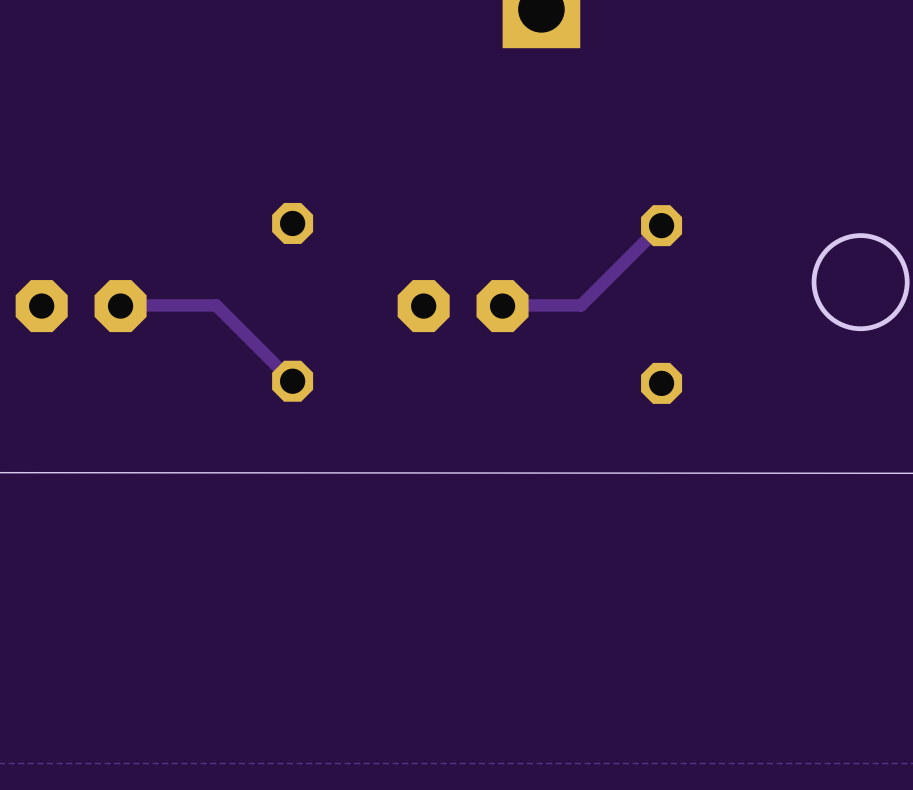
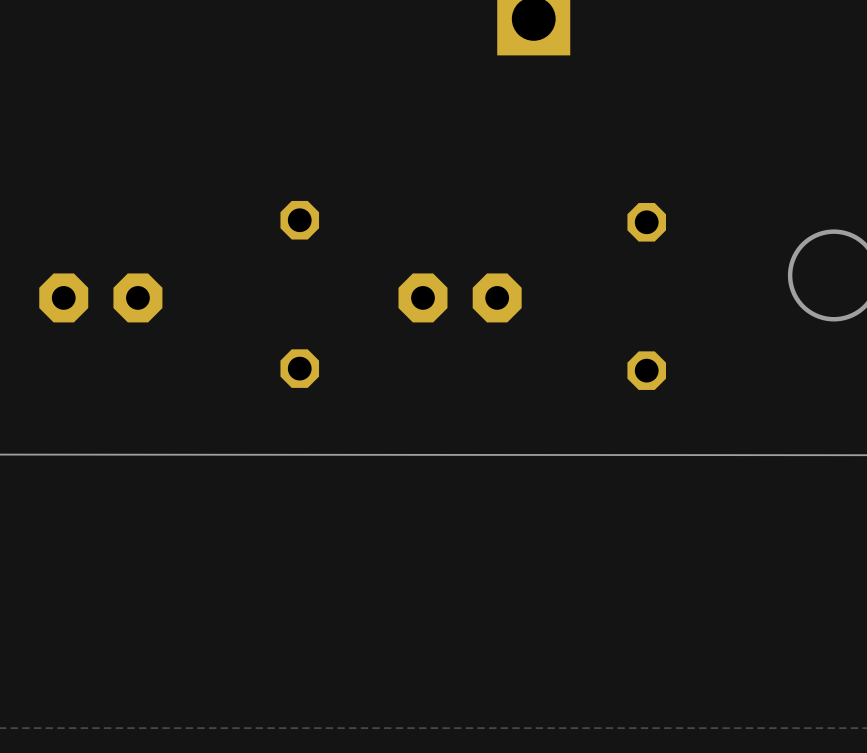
track: (661, 225) (581, 305) (502, 306) -> none
track: (120, 306) (216, 305) (292, 381) -> none

